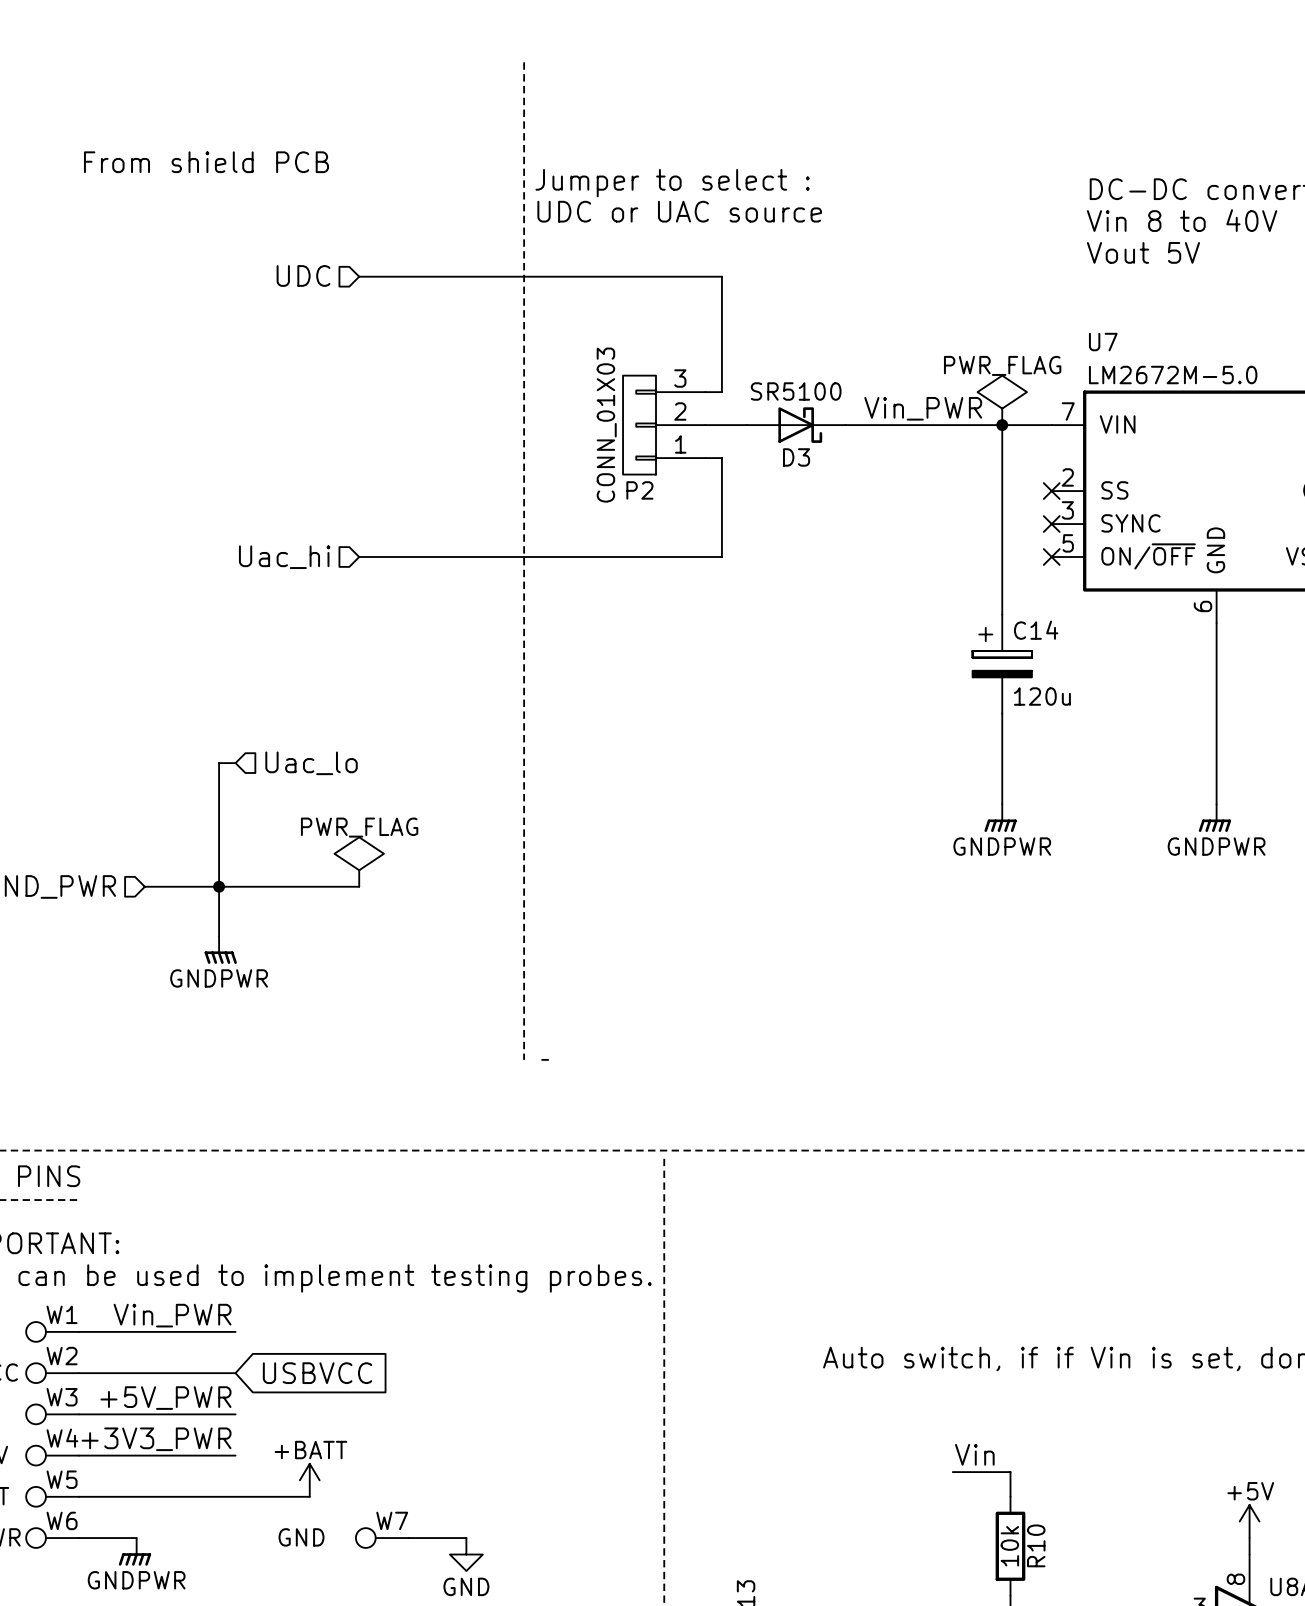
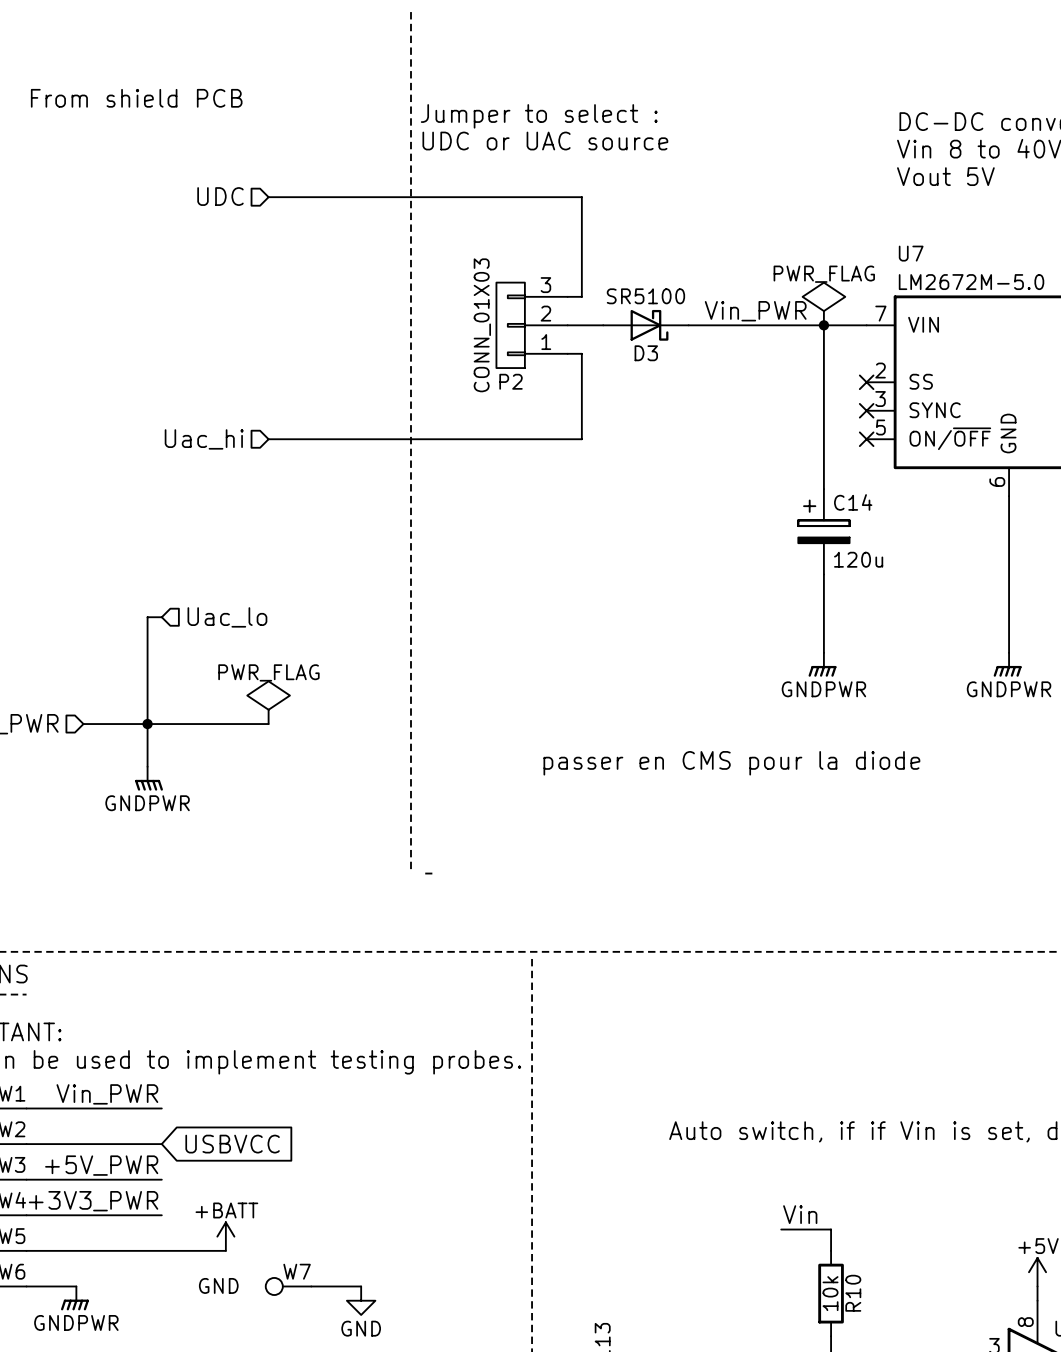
text: none -> passer en CMS pour la diode (731, 763)

